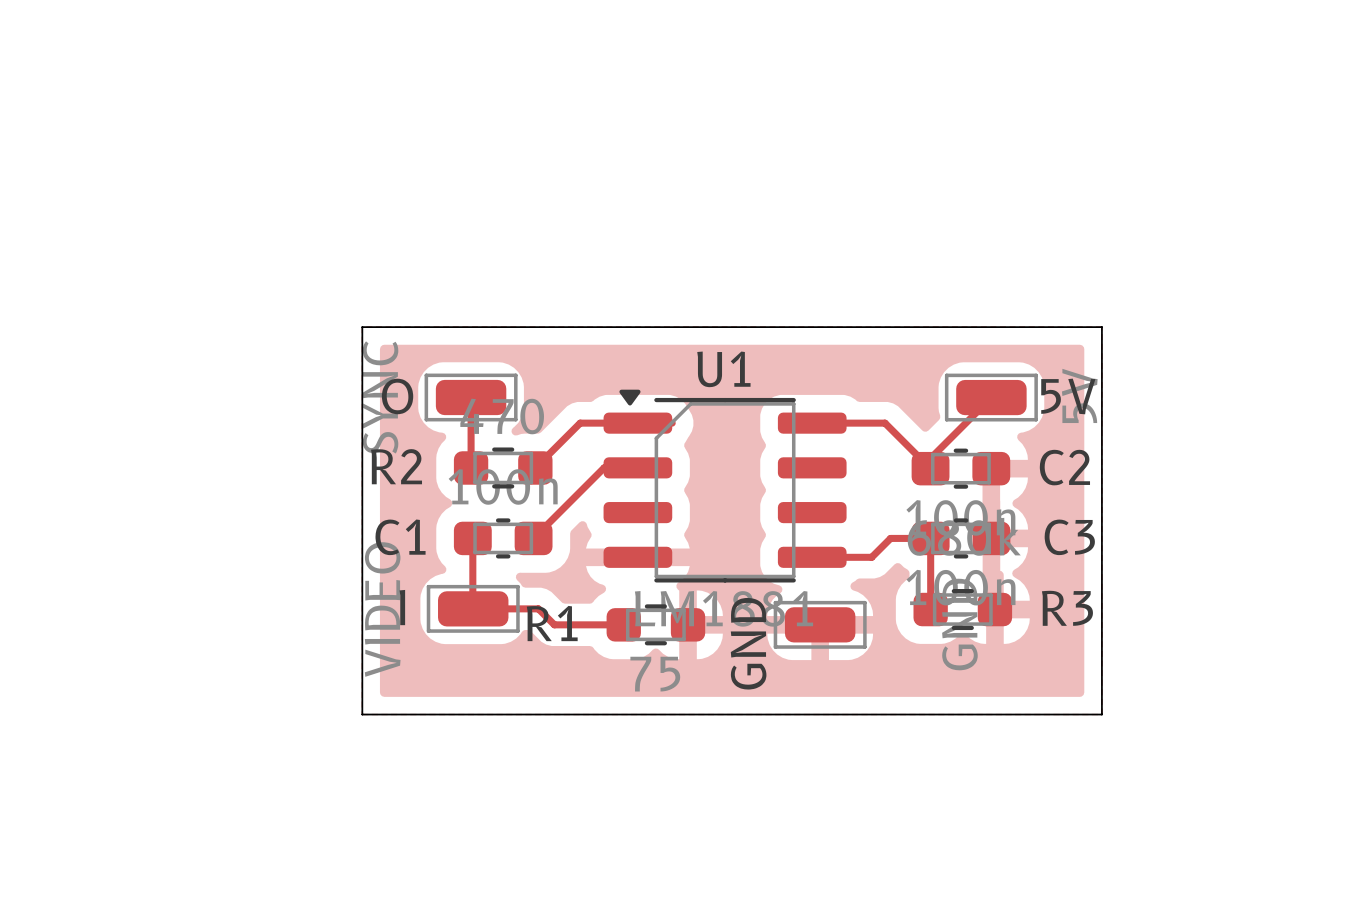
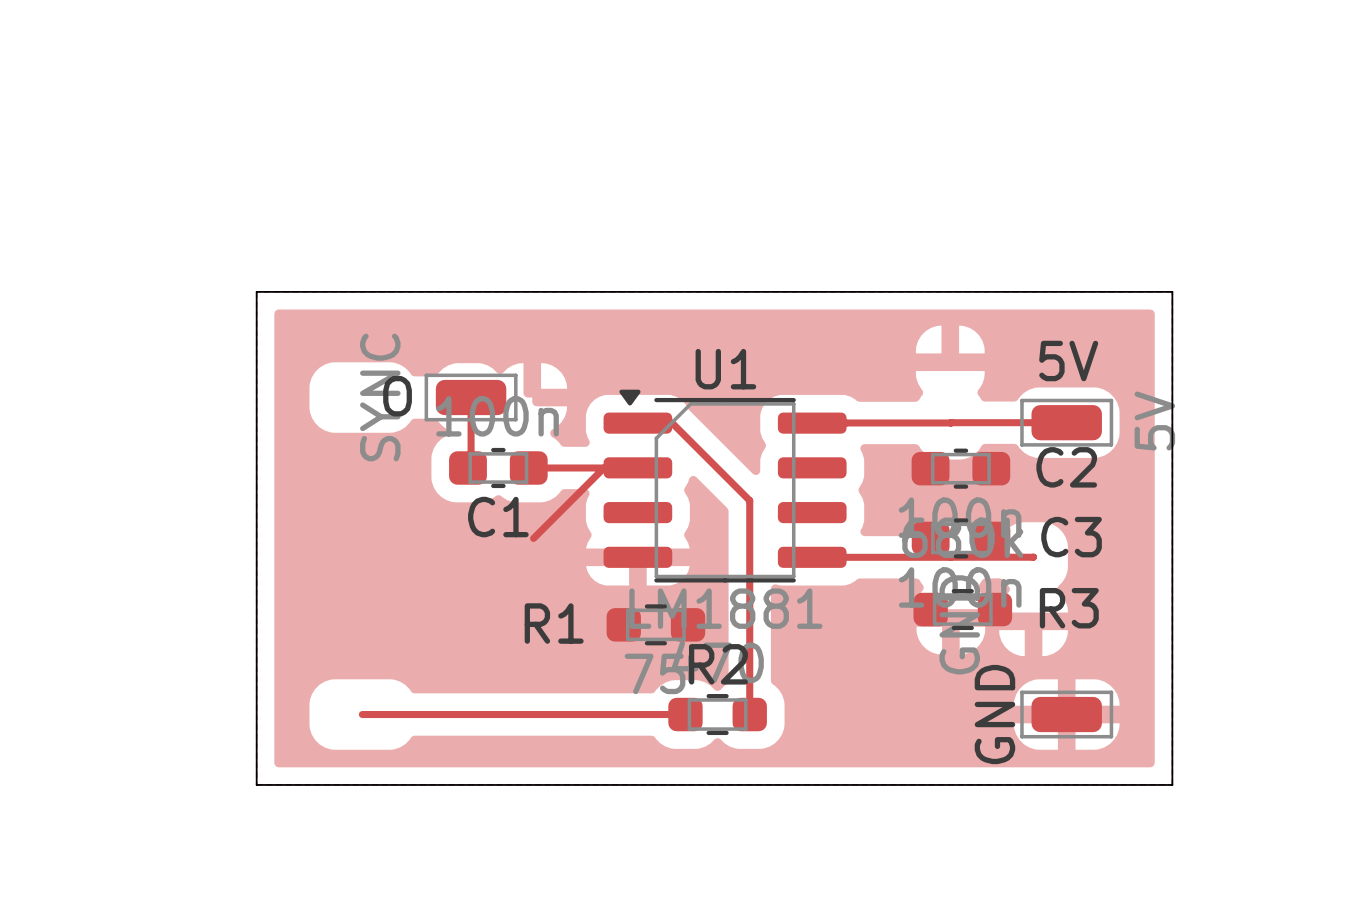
board edge: (362, 327) (1101, 327) (1101, 714) (362, 714) (362, 327) -> (256, 291) (256, 784) (1172, 784) (1172, 291) (256, 291)
5V name position: 5V (1068, 396) -> 5V (1068, 361)
top track: (991, 397) (930, 458) (930, 468) (885, 423) (845, 423) -> (951, 422) (845, 422)
5V position: (991, 397) -> (1066, 422)
top track: none -> (951, 422) (1066, 422)
top track: (637, 423) (580, 423) (535, 467) -> none
top track: none -> (672, 423) (749, 500) (749, 714)
R2 name position: R2 (396, 466) -> R2 (718, 664)
R2 position: (503, 467) -> (717, 714)
C1 name position: C1 (400, 537) -> C1 (498, 517)
top track: (472, 538) (472, 608) -> none
C1 position: (503, 538) -> (498, 467)
top track: (871, 557) (890, 538) (930, 538) (930, 609) -> (871, 557) (950, 557)
top track: none -> (950, 557) (1033, 557)
top track: (473, 608) (538, 608) (554, 624) (623, 624) -> none
I: VIDEO (473, 608) -> none
GND position: (820, 624) -> (1066, 714)
GND name position: GND (748, 643) -> GND (994, 714)
top track: none -> (362, 714) (685, 714)

